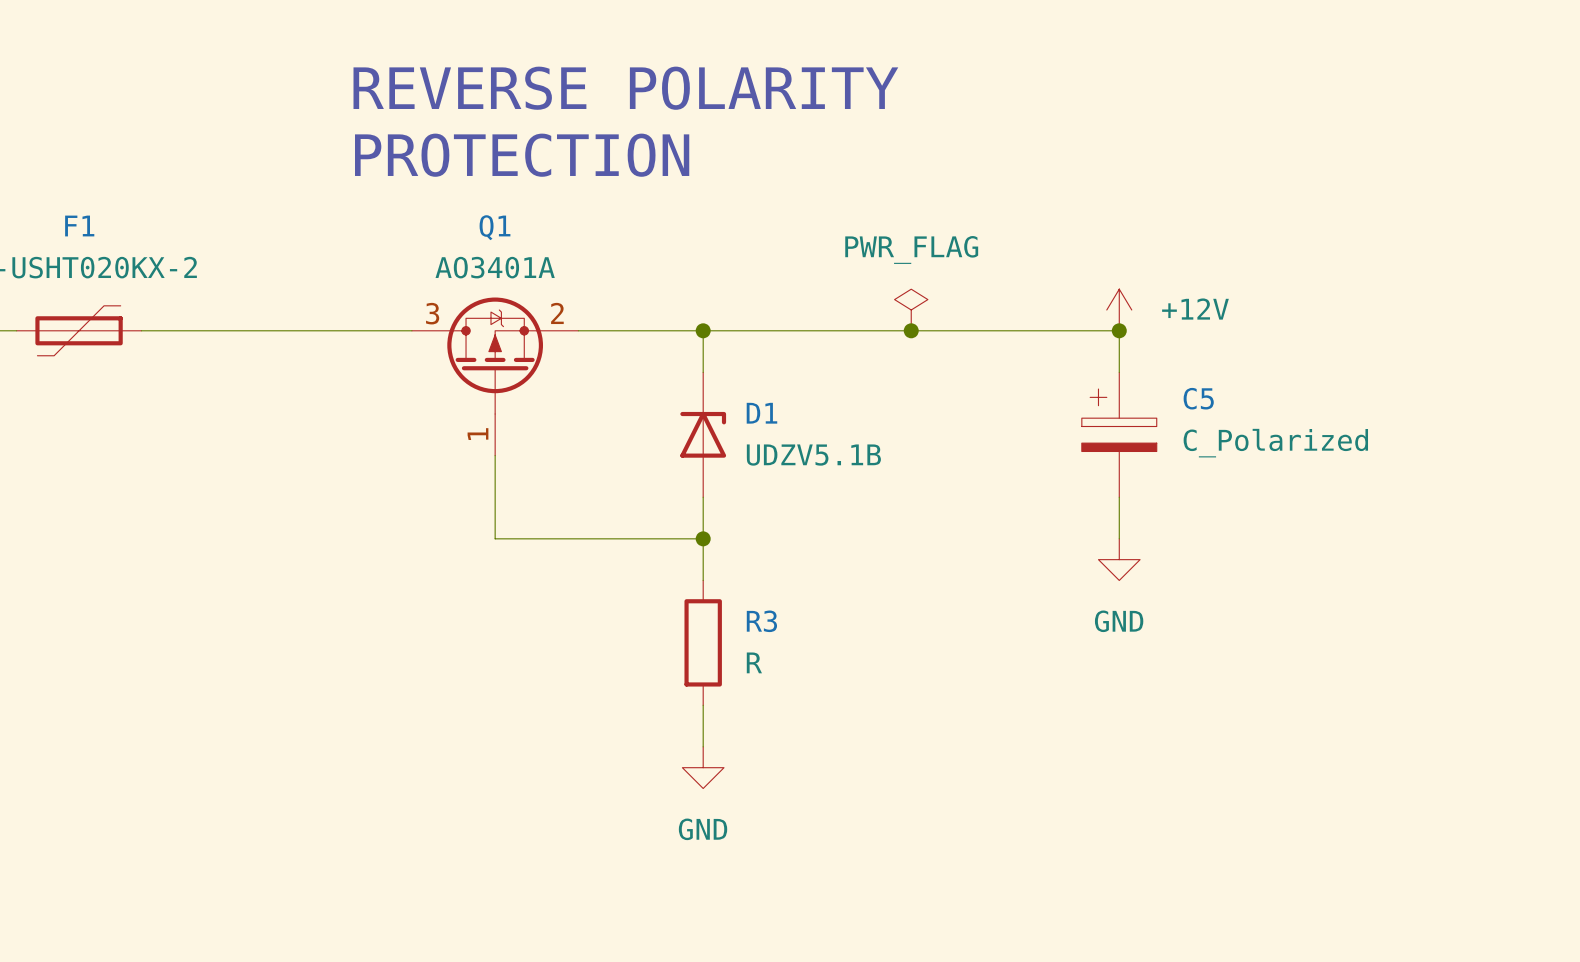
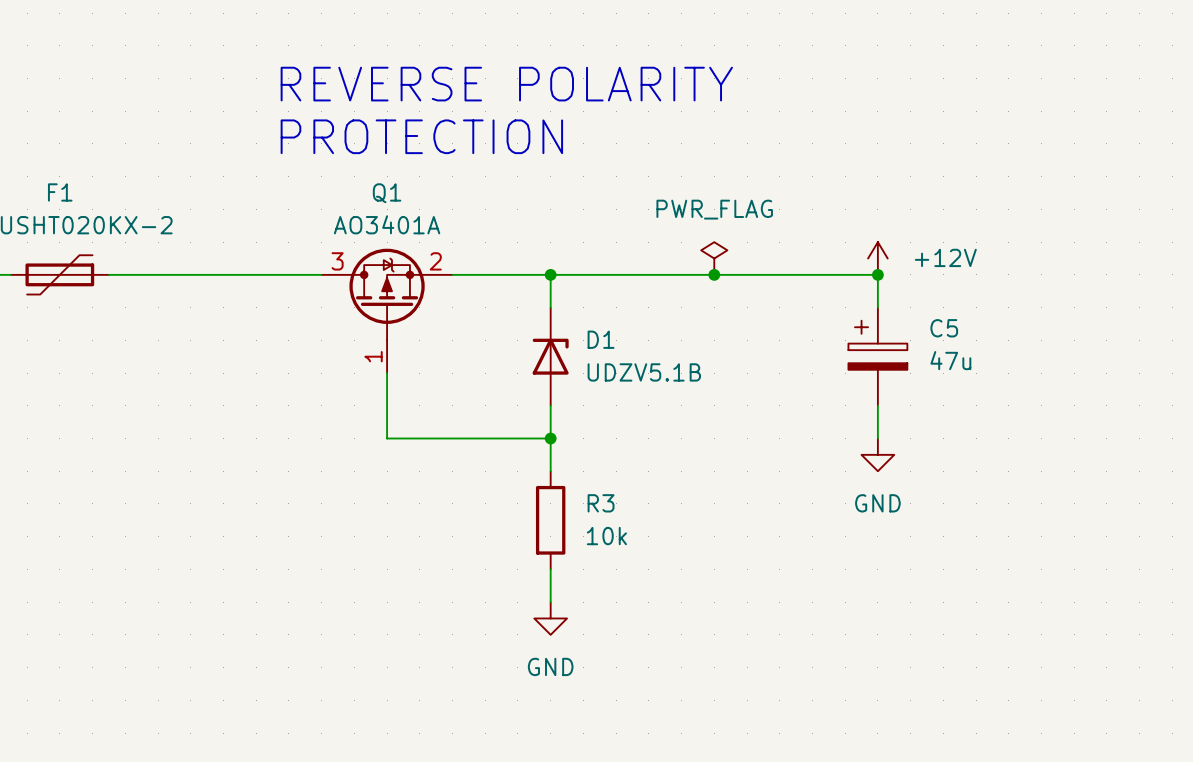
C5 value: C_Polarized (1275, 443) -> 47u (950, 360)
R3 value: R (754, 662) -> 10k (606, 536)

